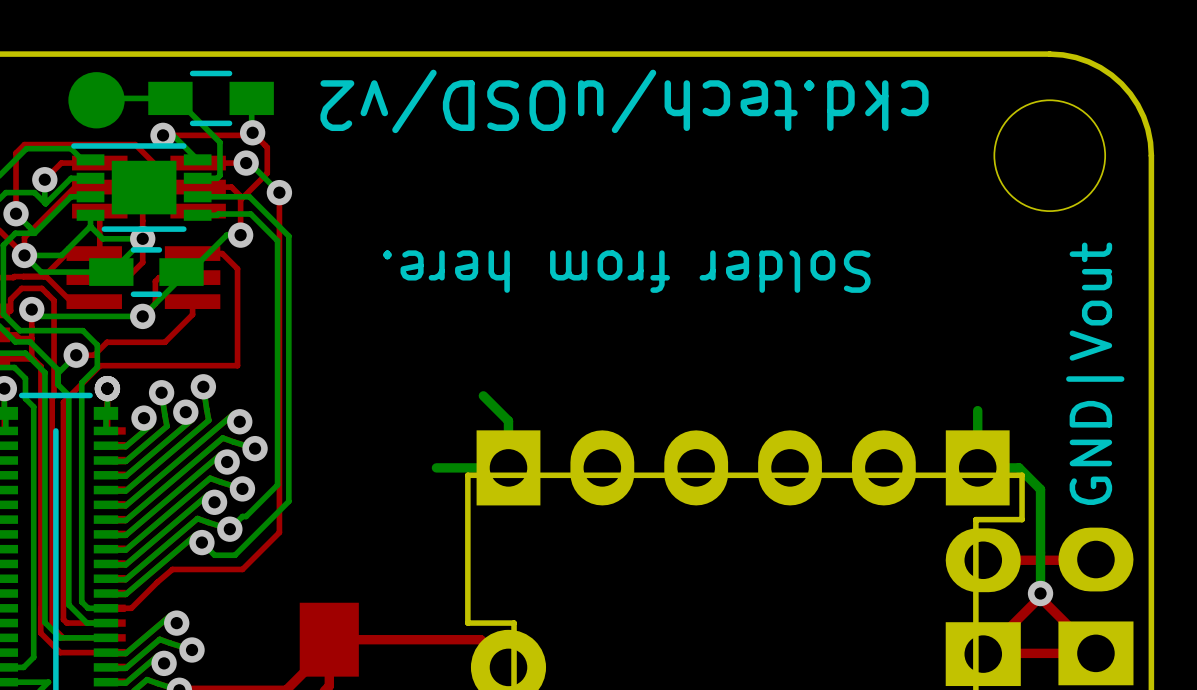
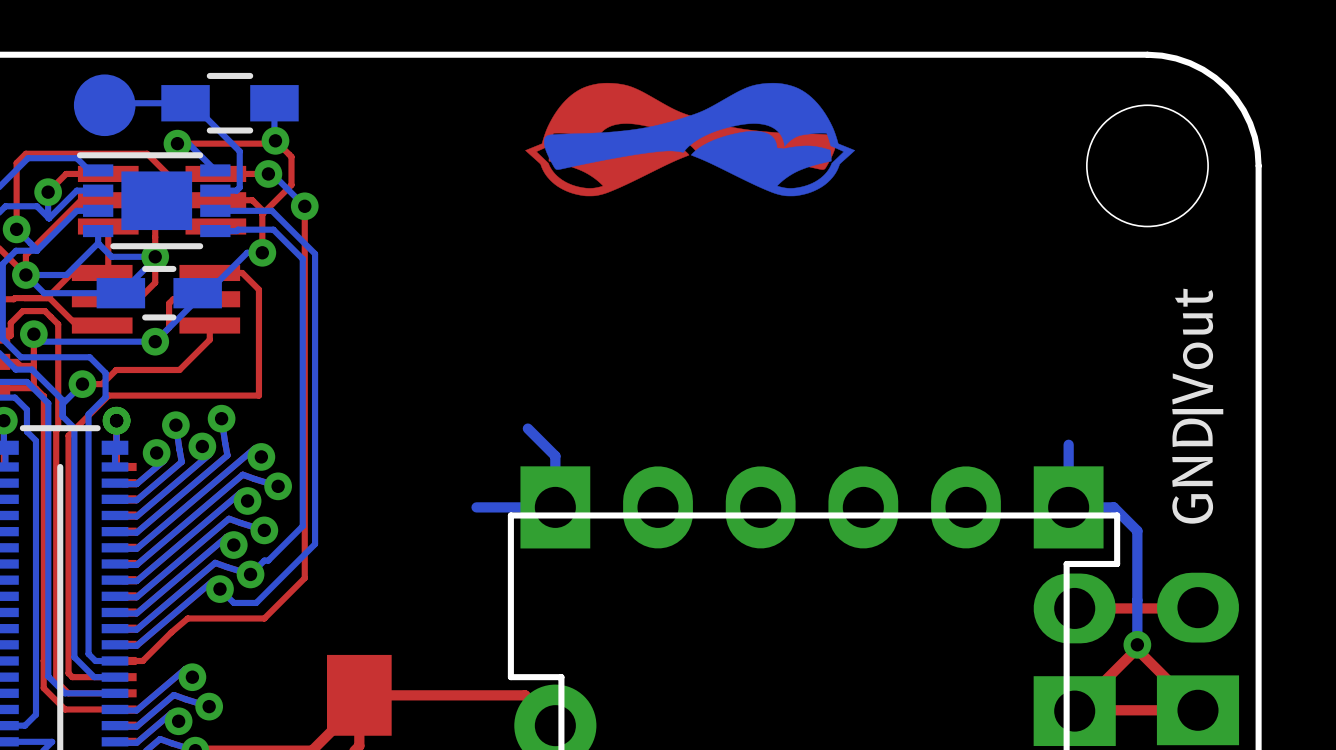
drawing: none -> [525, 82, 855, 197]
text: ckd.tech/uOSD/v2 (624, 101) -> none
text: Solder from here. (626, 271) -> none

